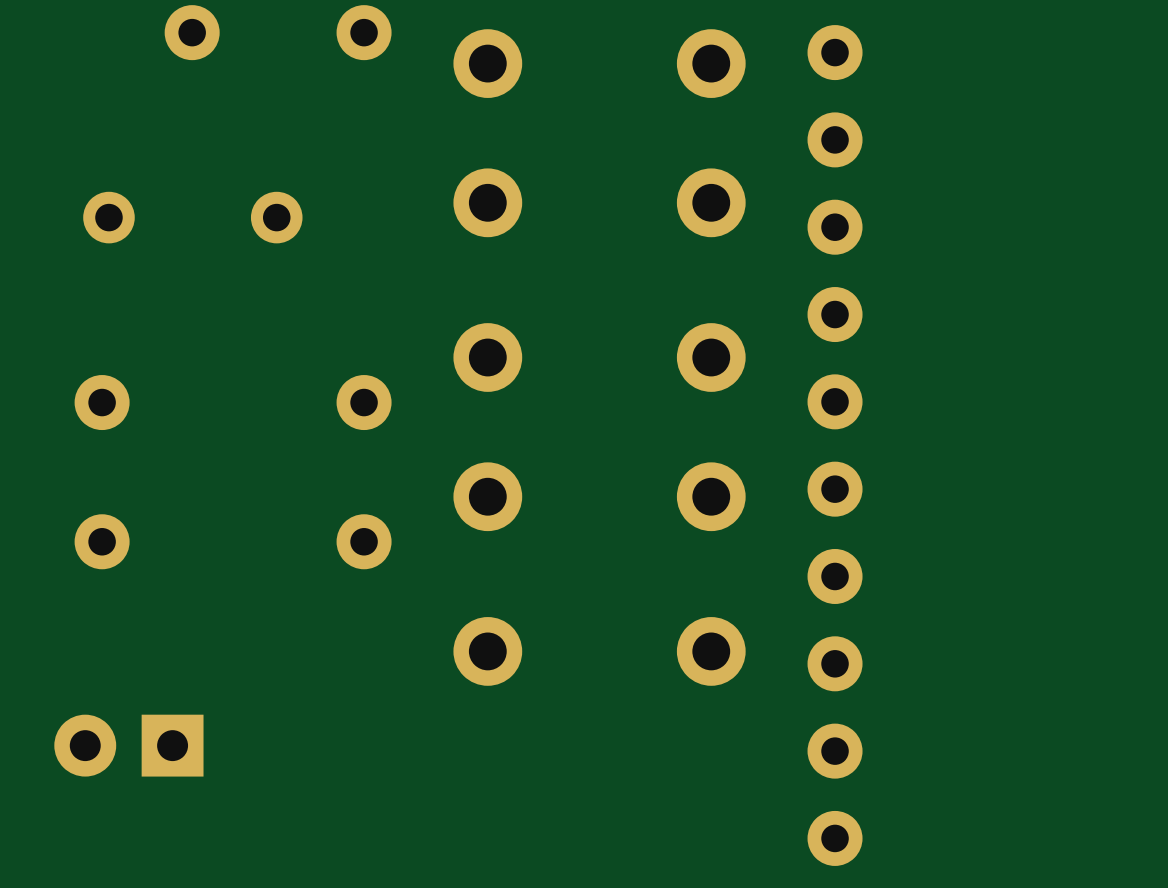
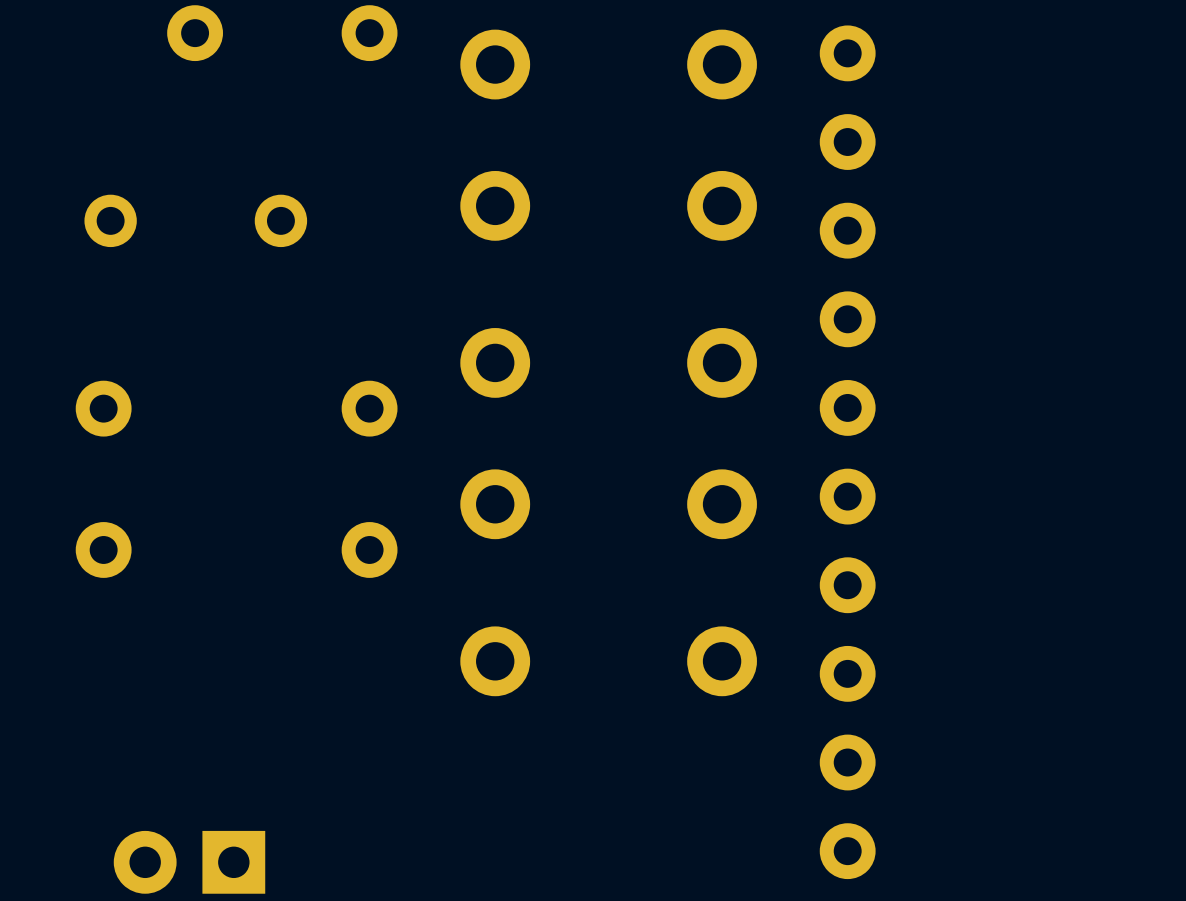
part position: (128, 745) -> (189, 862)

